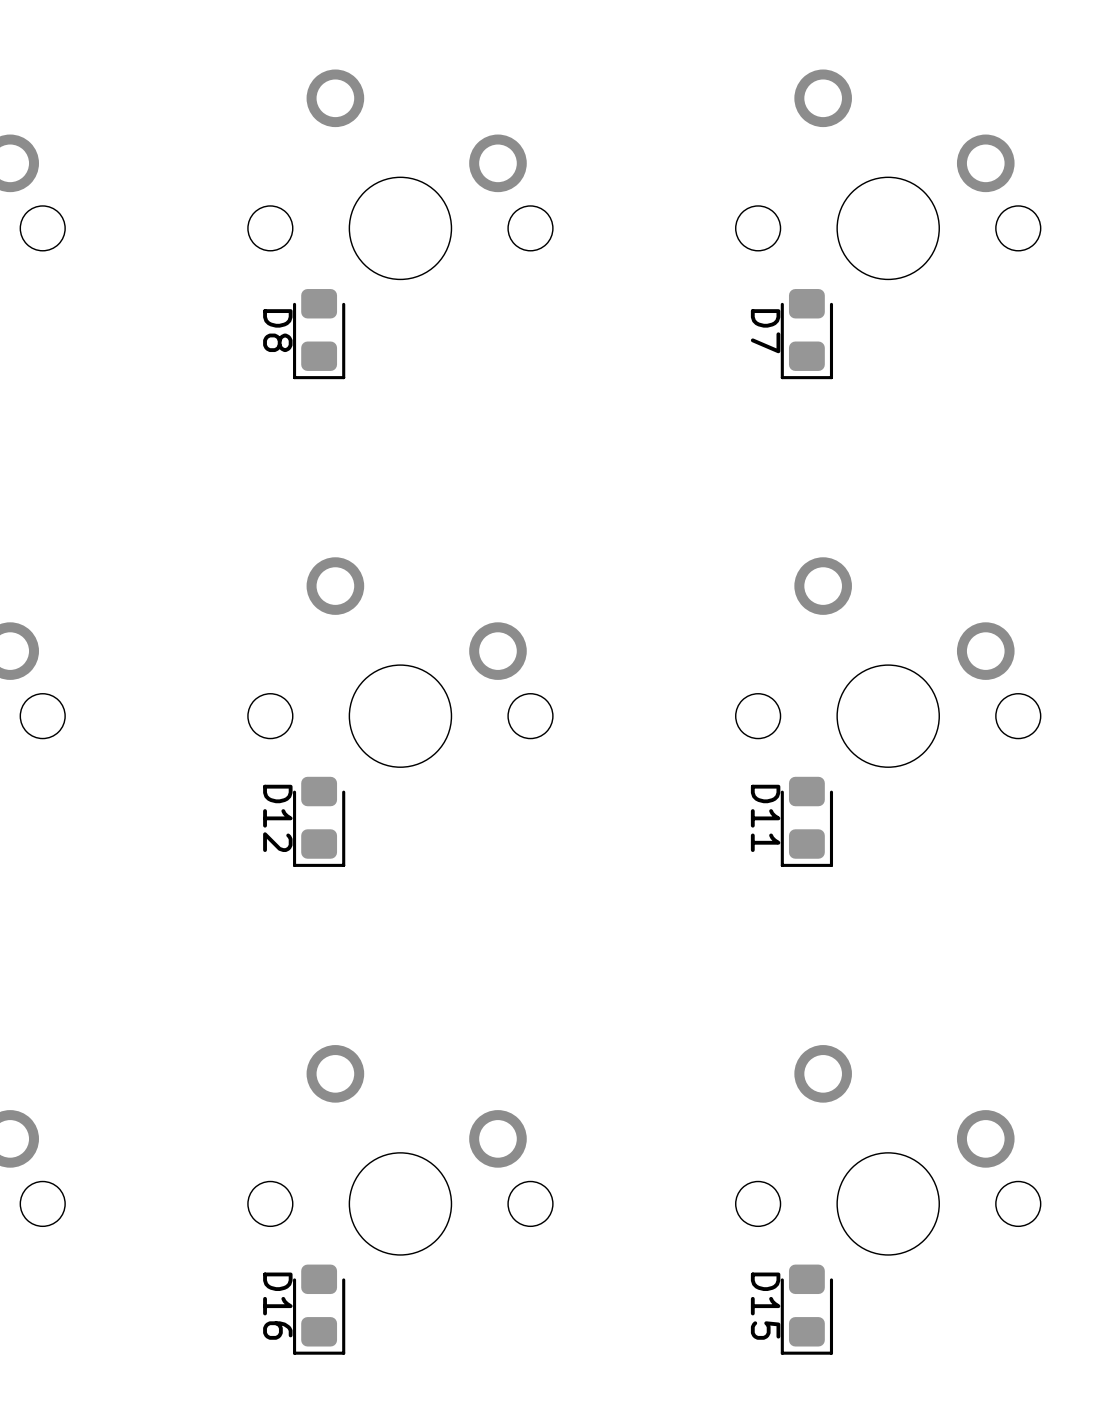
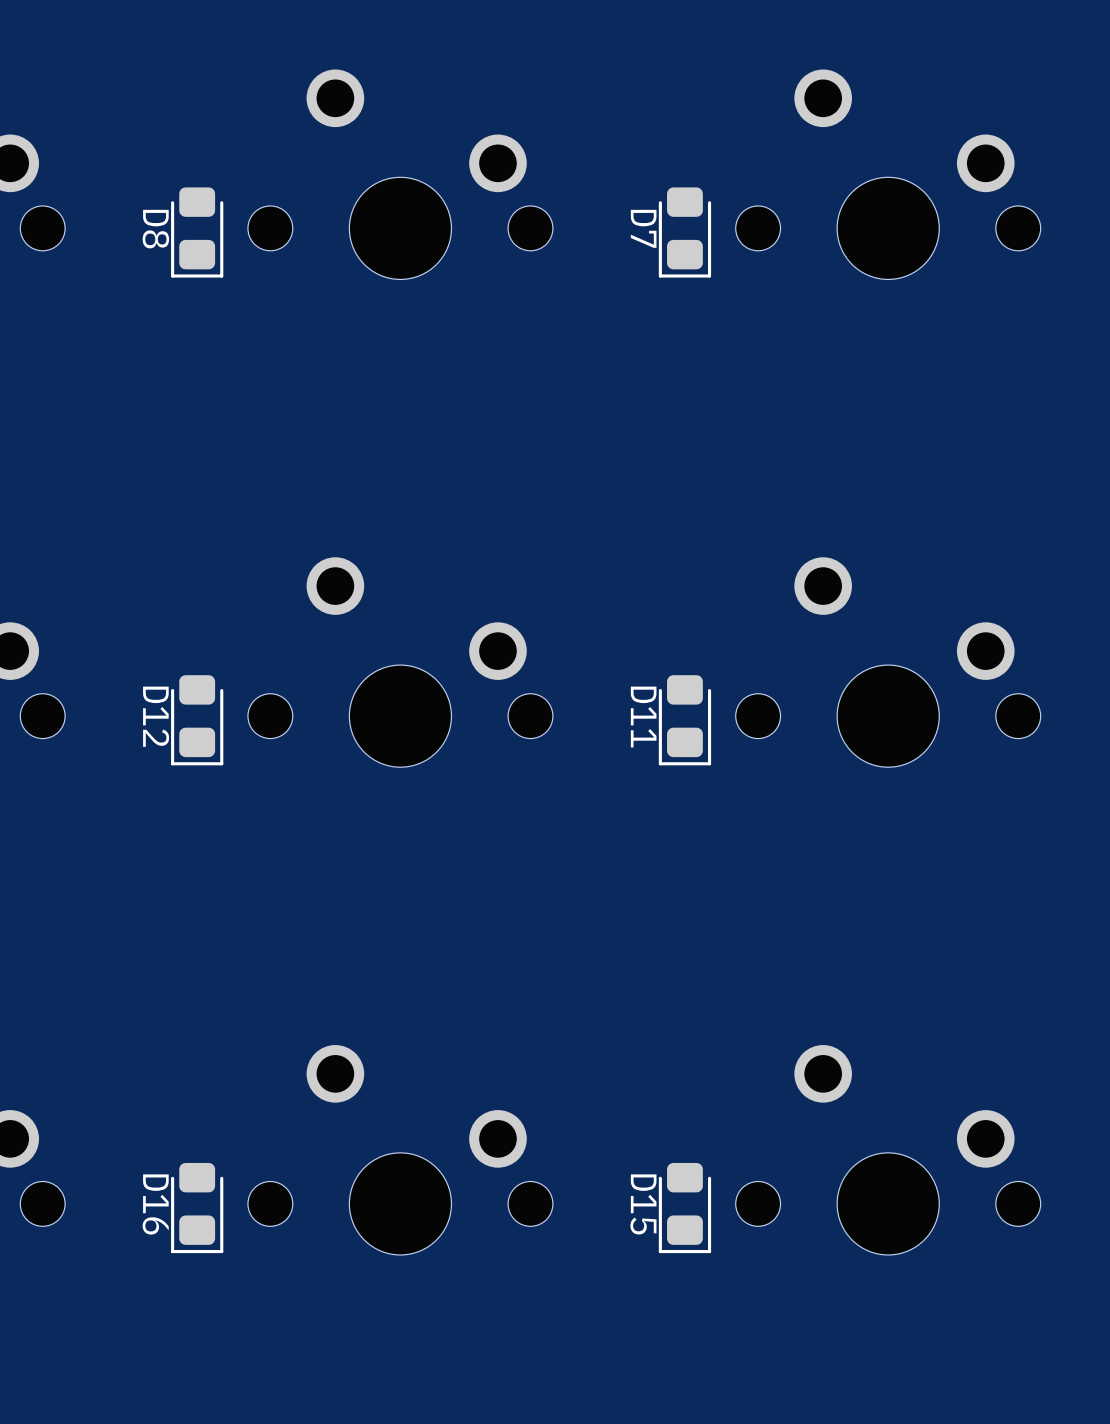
D8 position: (319, 334) -> (197, 232)
D7 position: (806, 334) -> (684, 232)
D12 position: (319, 821) -> (197, 720)
D11 position: (806, 821) -> (684, 720)
D16 position: (319, 1309) -> (197, 1208)
D15 position: (806, 1309) -> (684, 1208)

